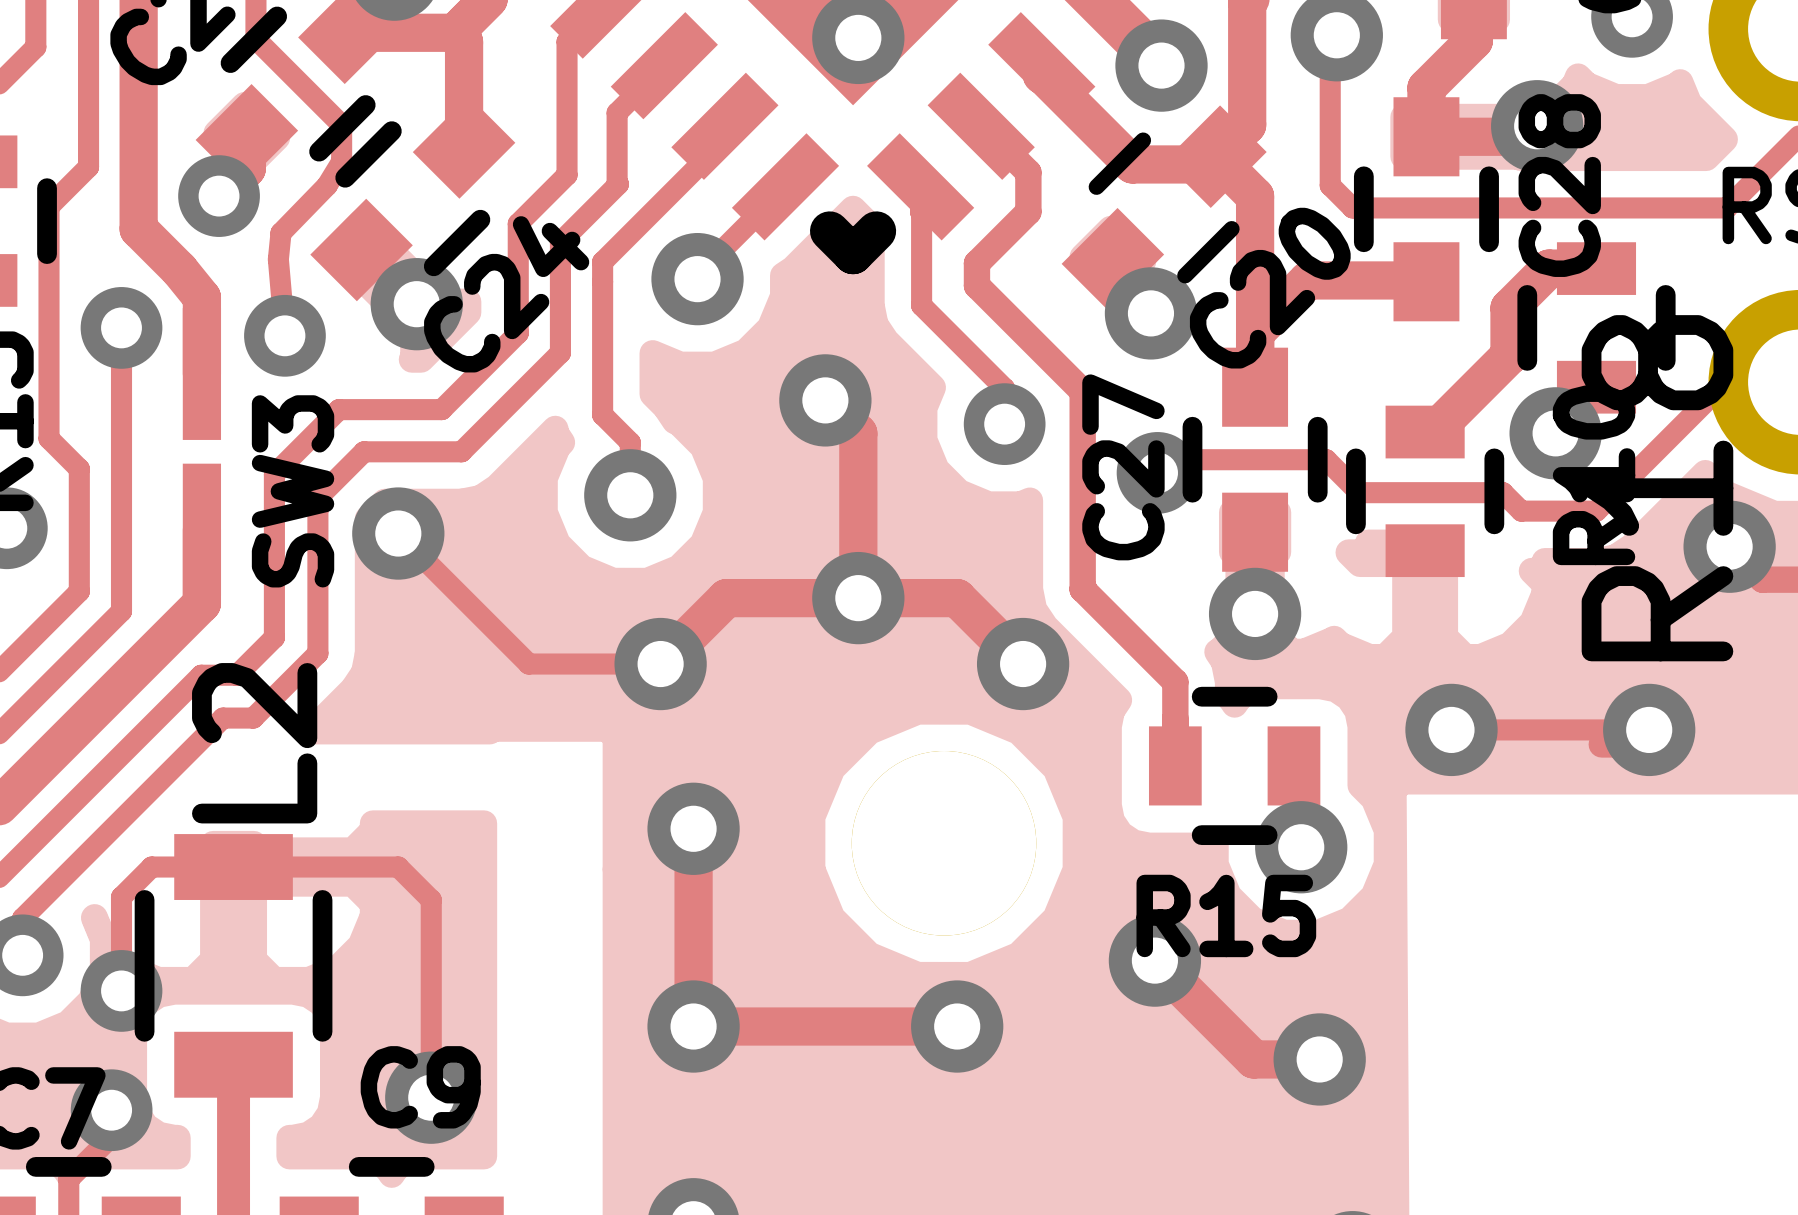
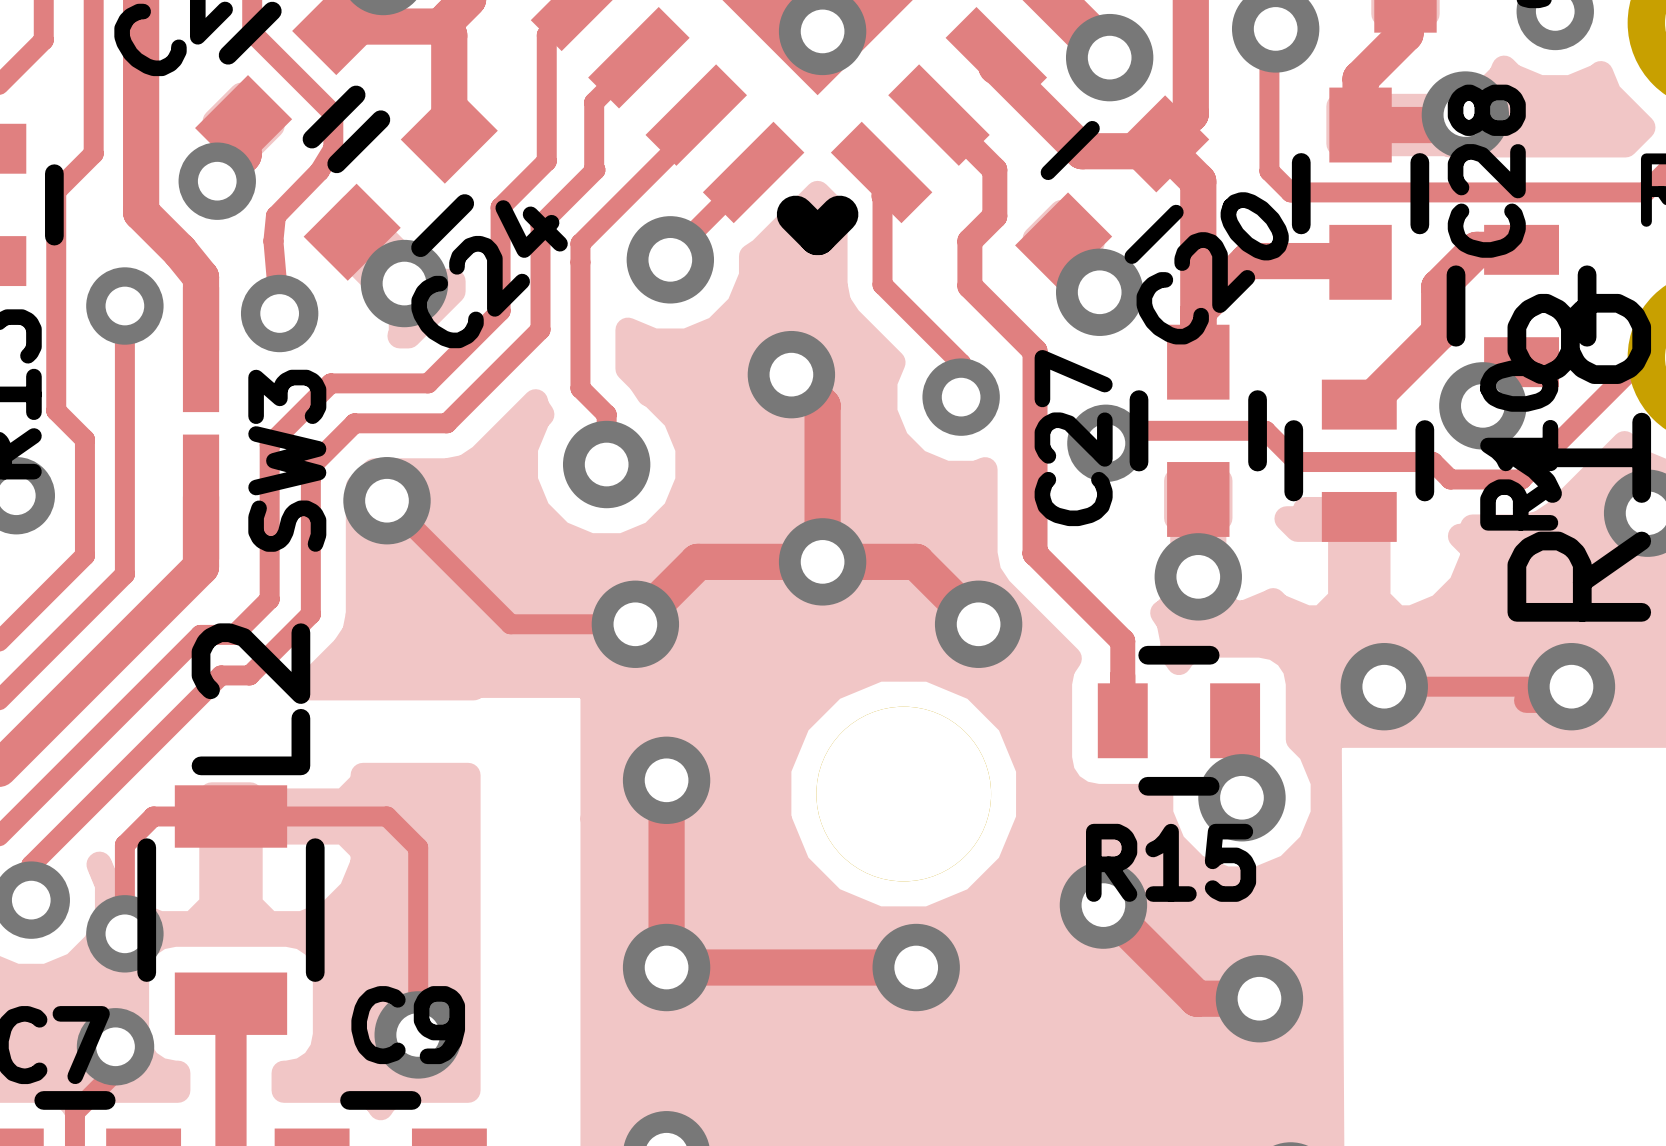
track: (1028, 172) (1028, 211) (976, 263) (976, 285) (1082, 391) -> (983, 158) (994, 169) (994, 216) (969, 241) (969, 286) (1035, 351) (1035, 366)

